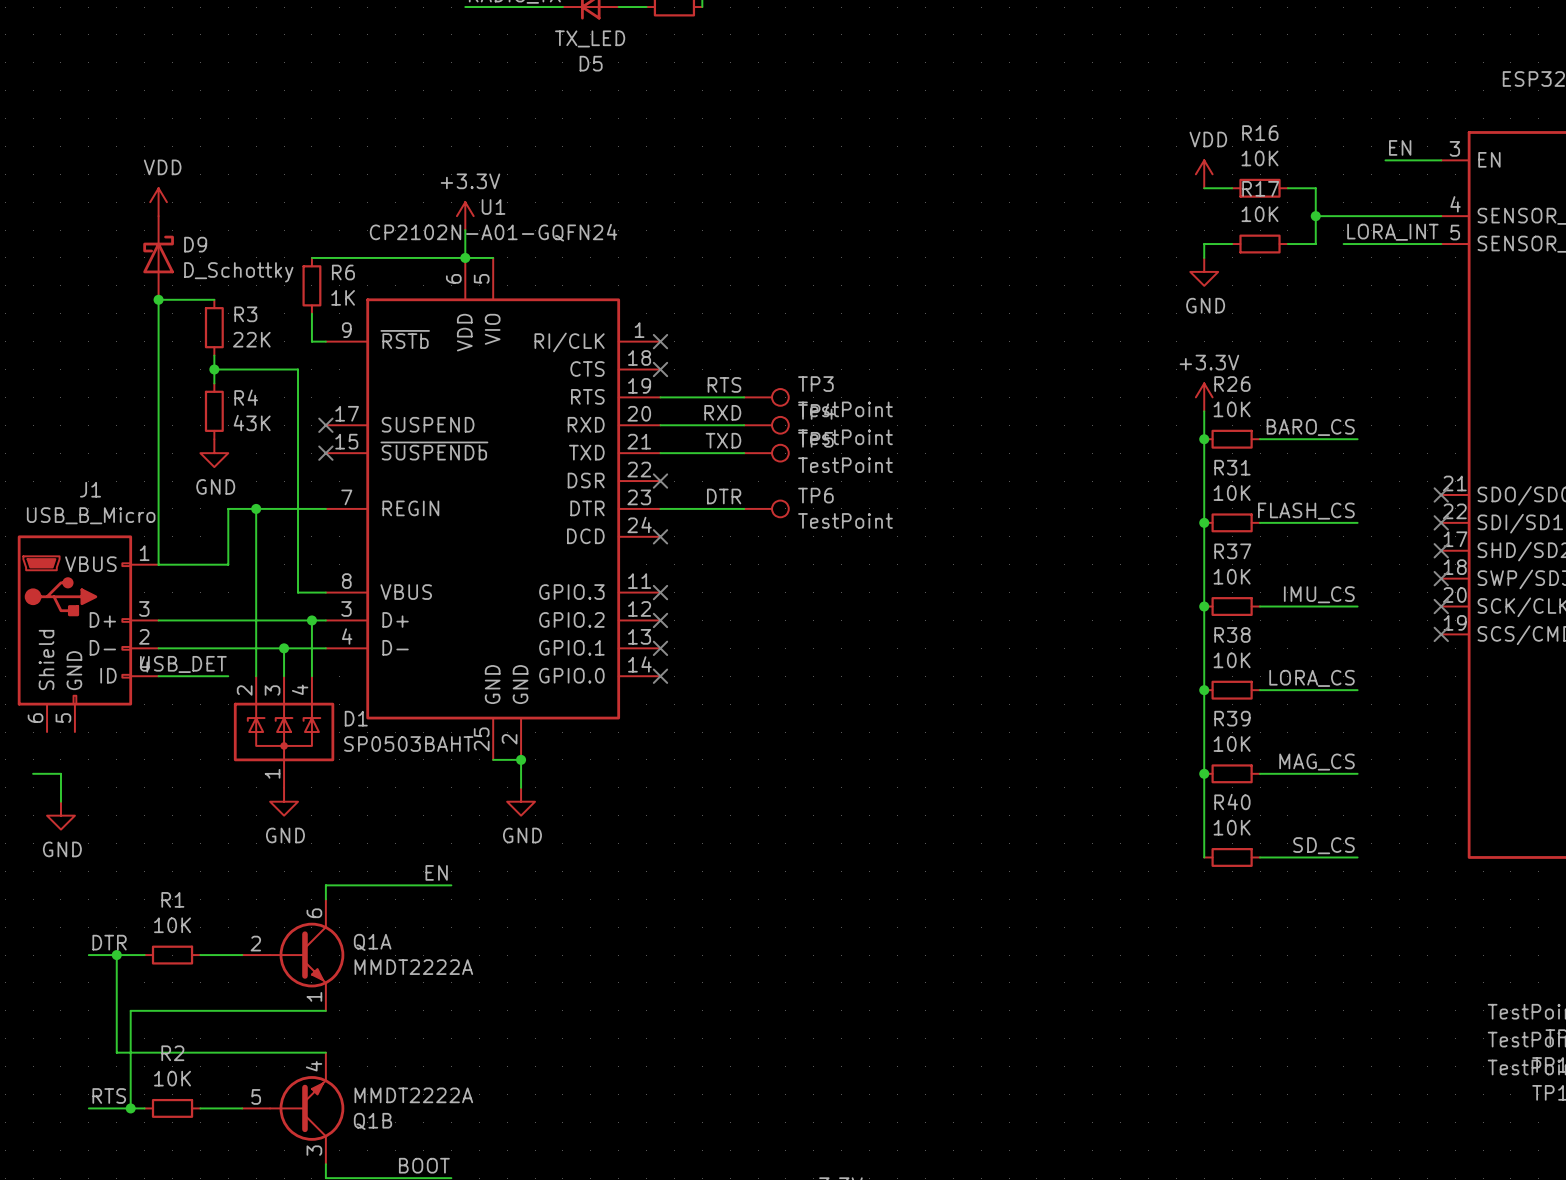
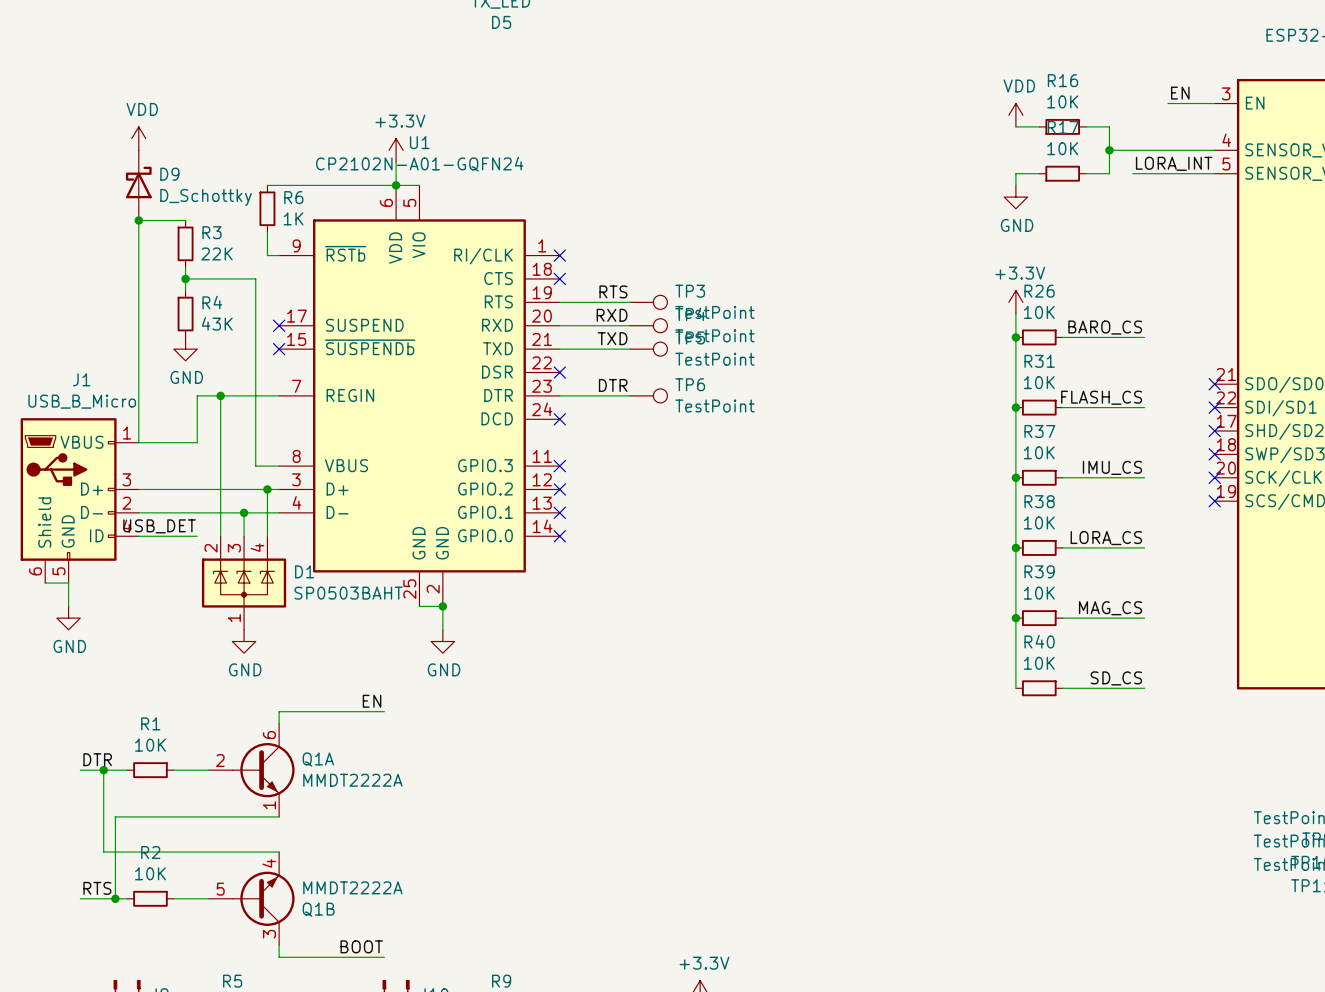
wire: (33, 773) (60, 773) (60, 801) -> (45, 583) (68, 583) (68, 606)
power symbol position: GND (60, 815) -> GND (68, 618)

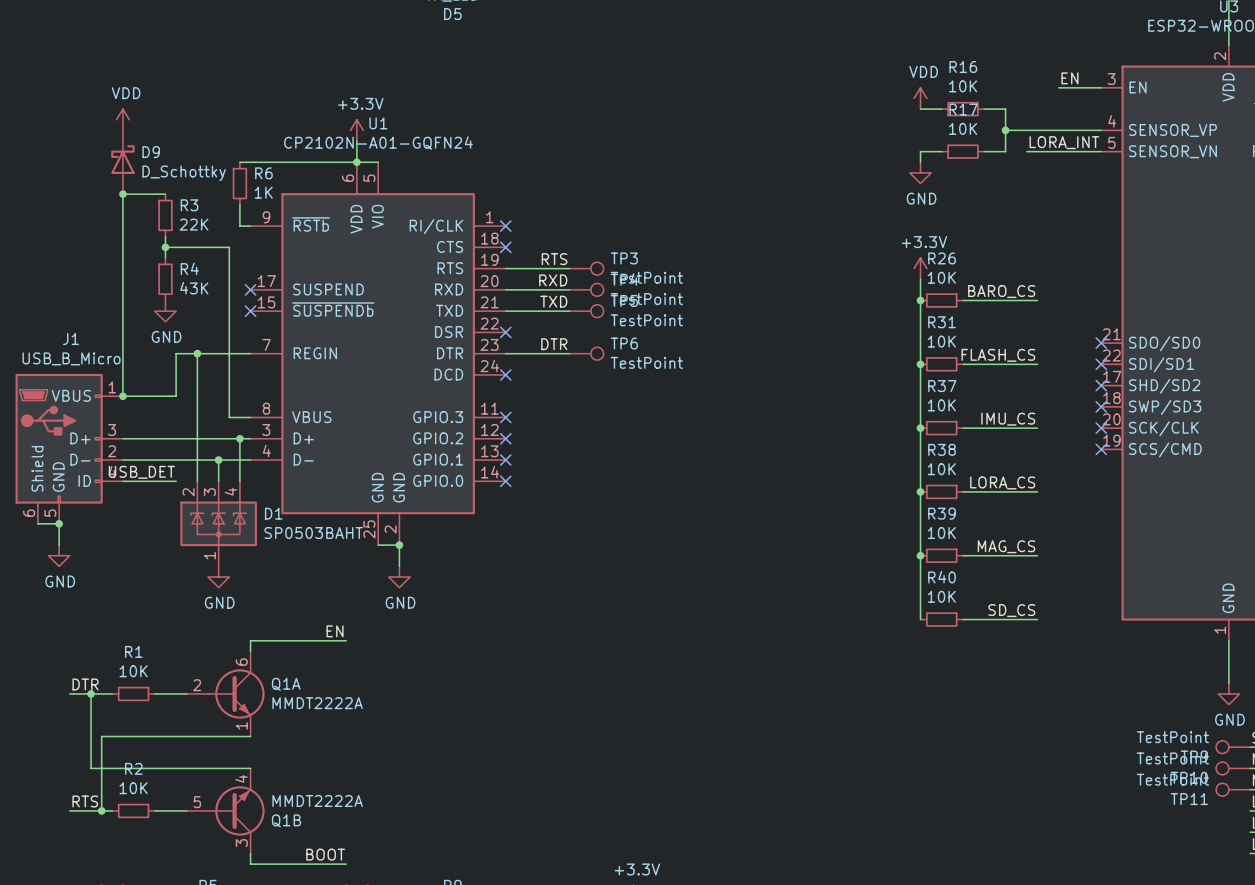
junction: none -> (122, 396)
junction: none -> (59, 523)

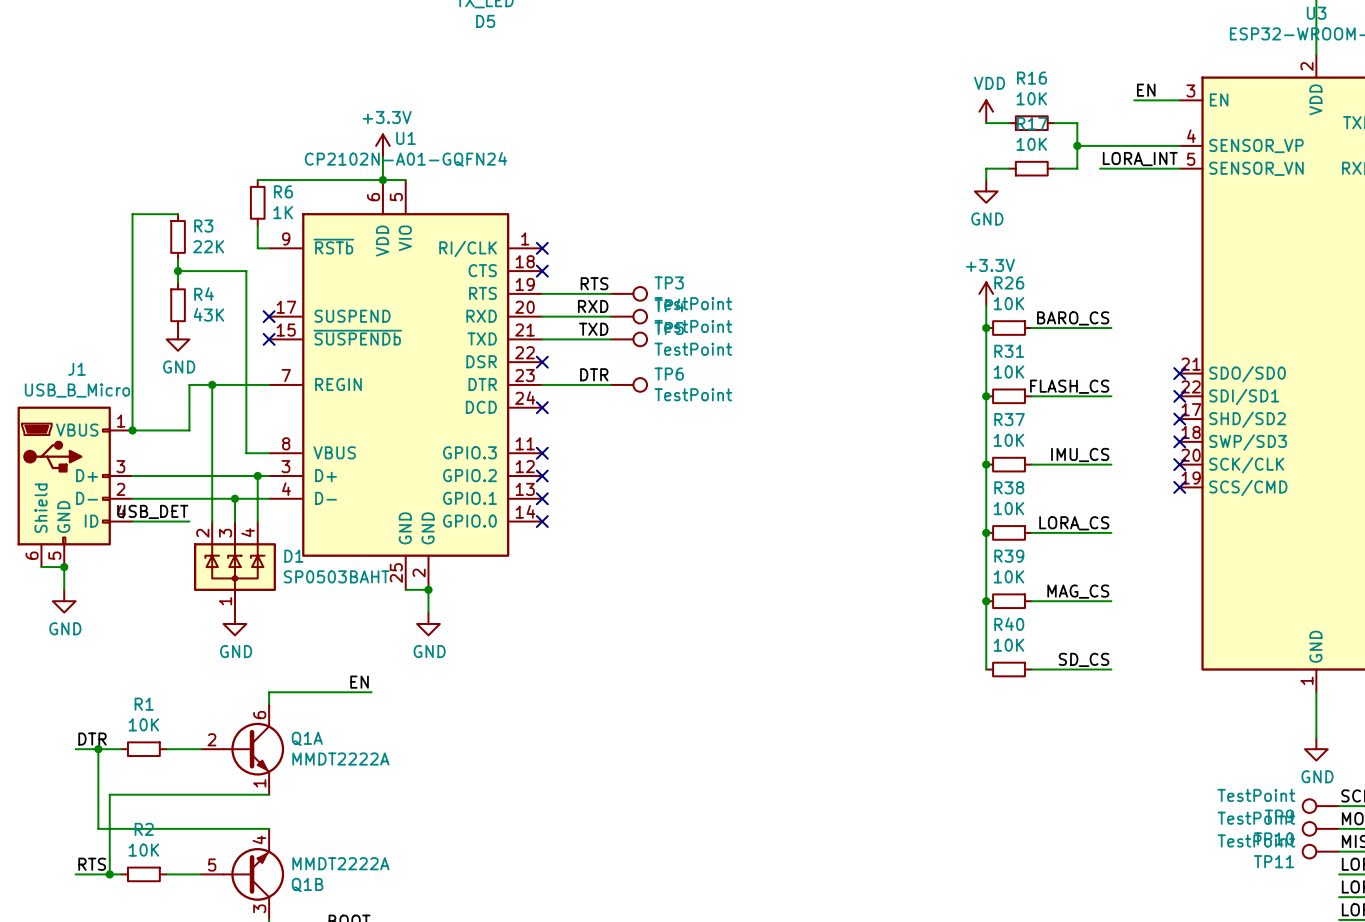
power symbol: VDD (122, 119) -> none
D9: D_Schottky (122, 162) -> none
junction: (122, 194) -> none

